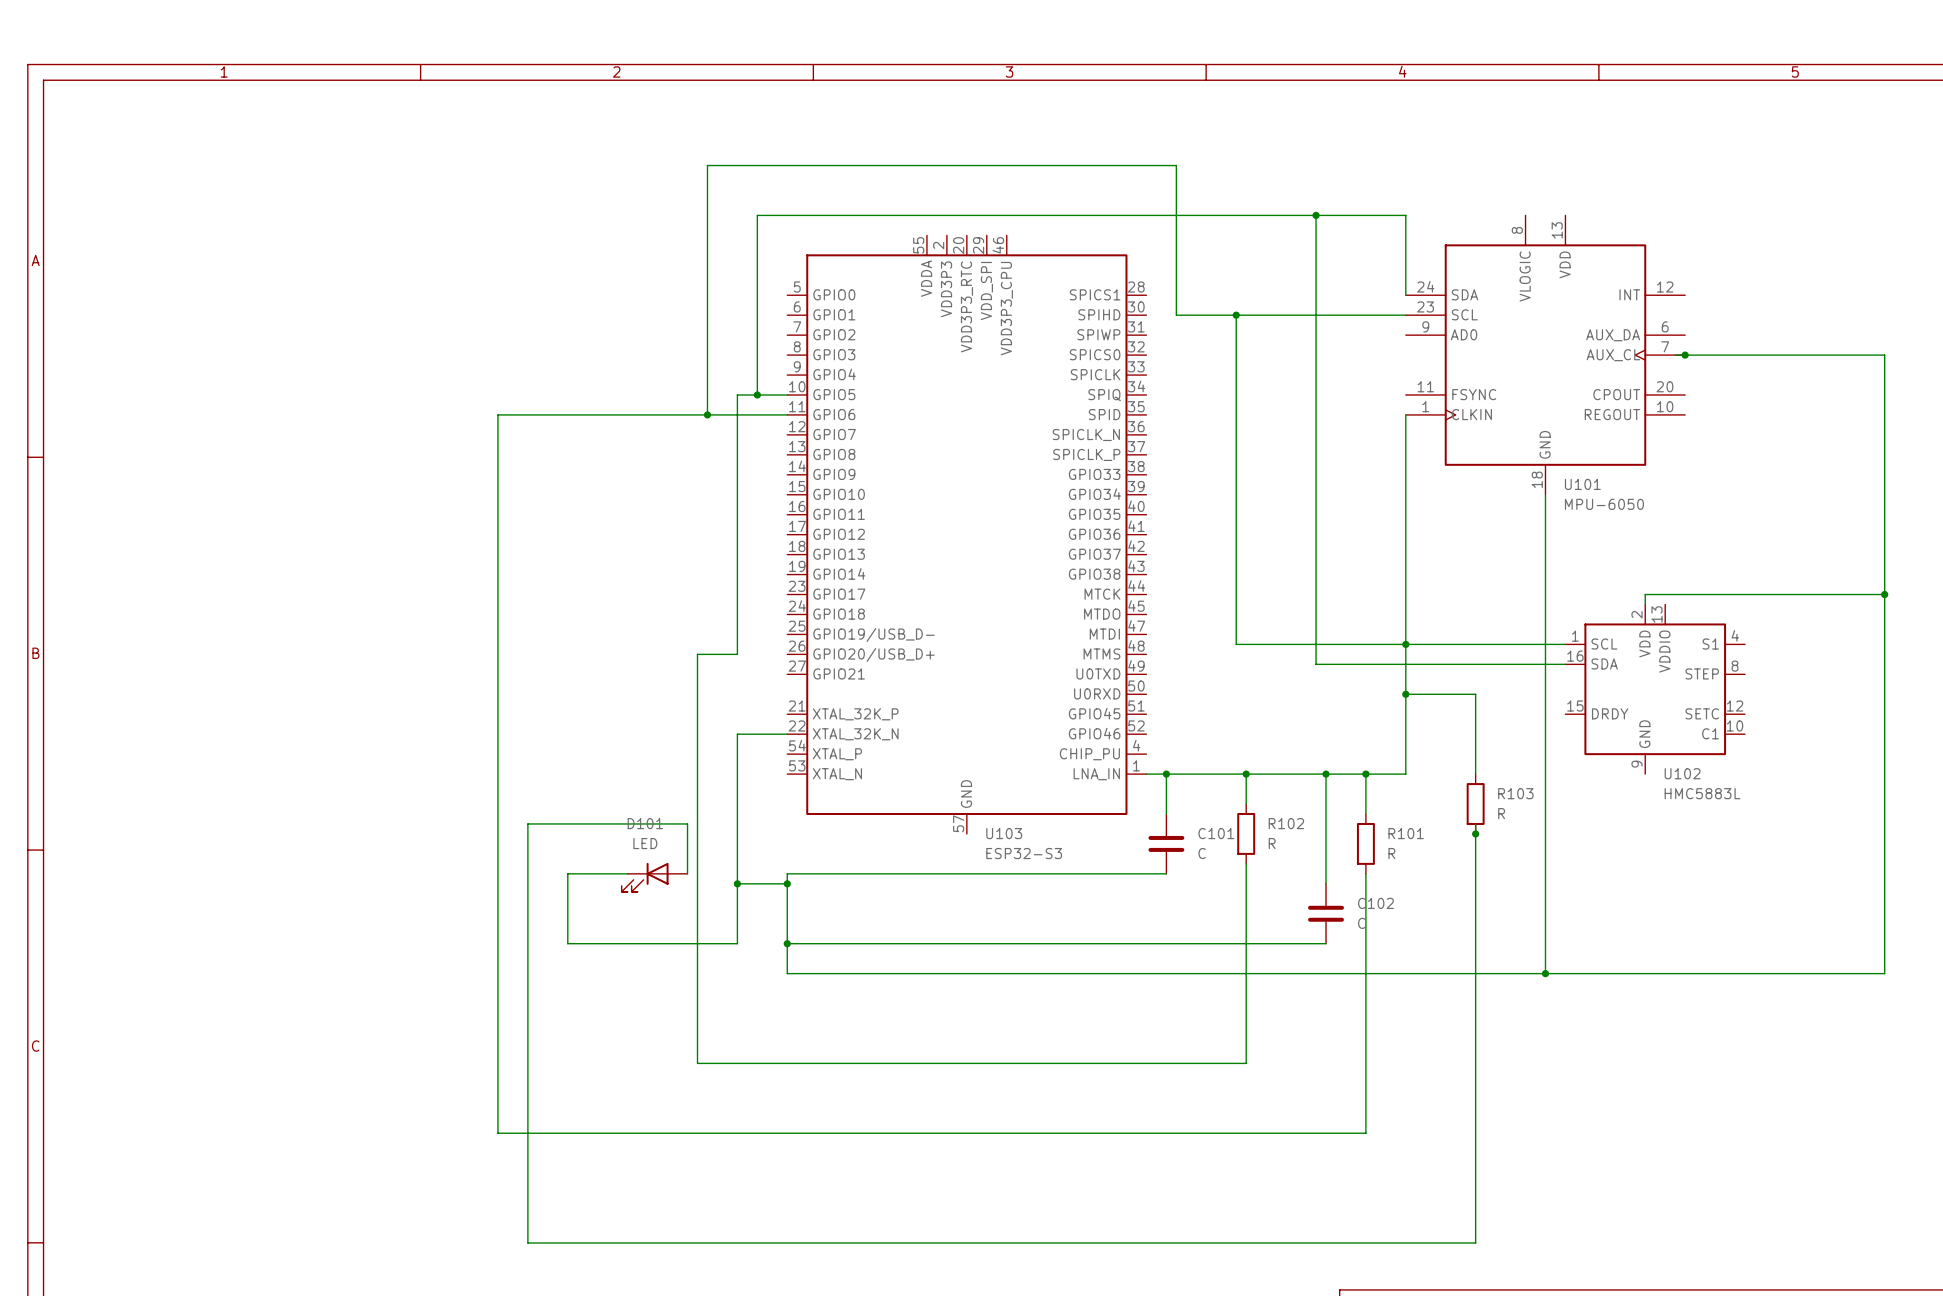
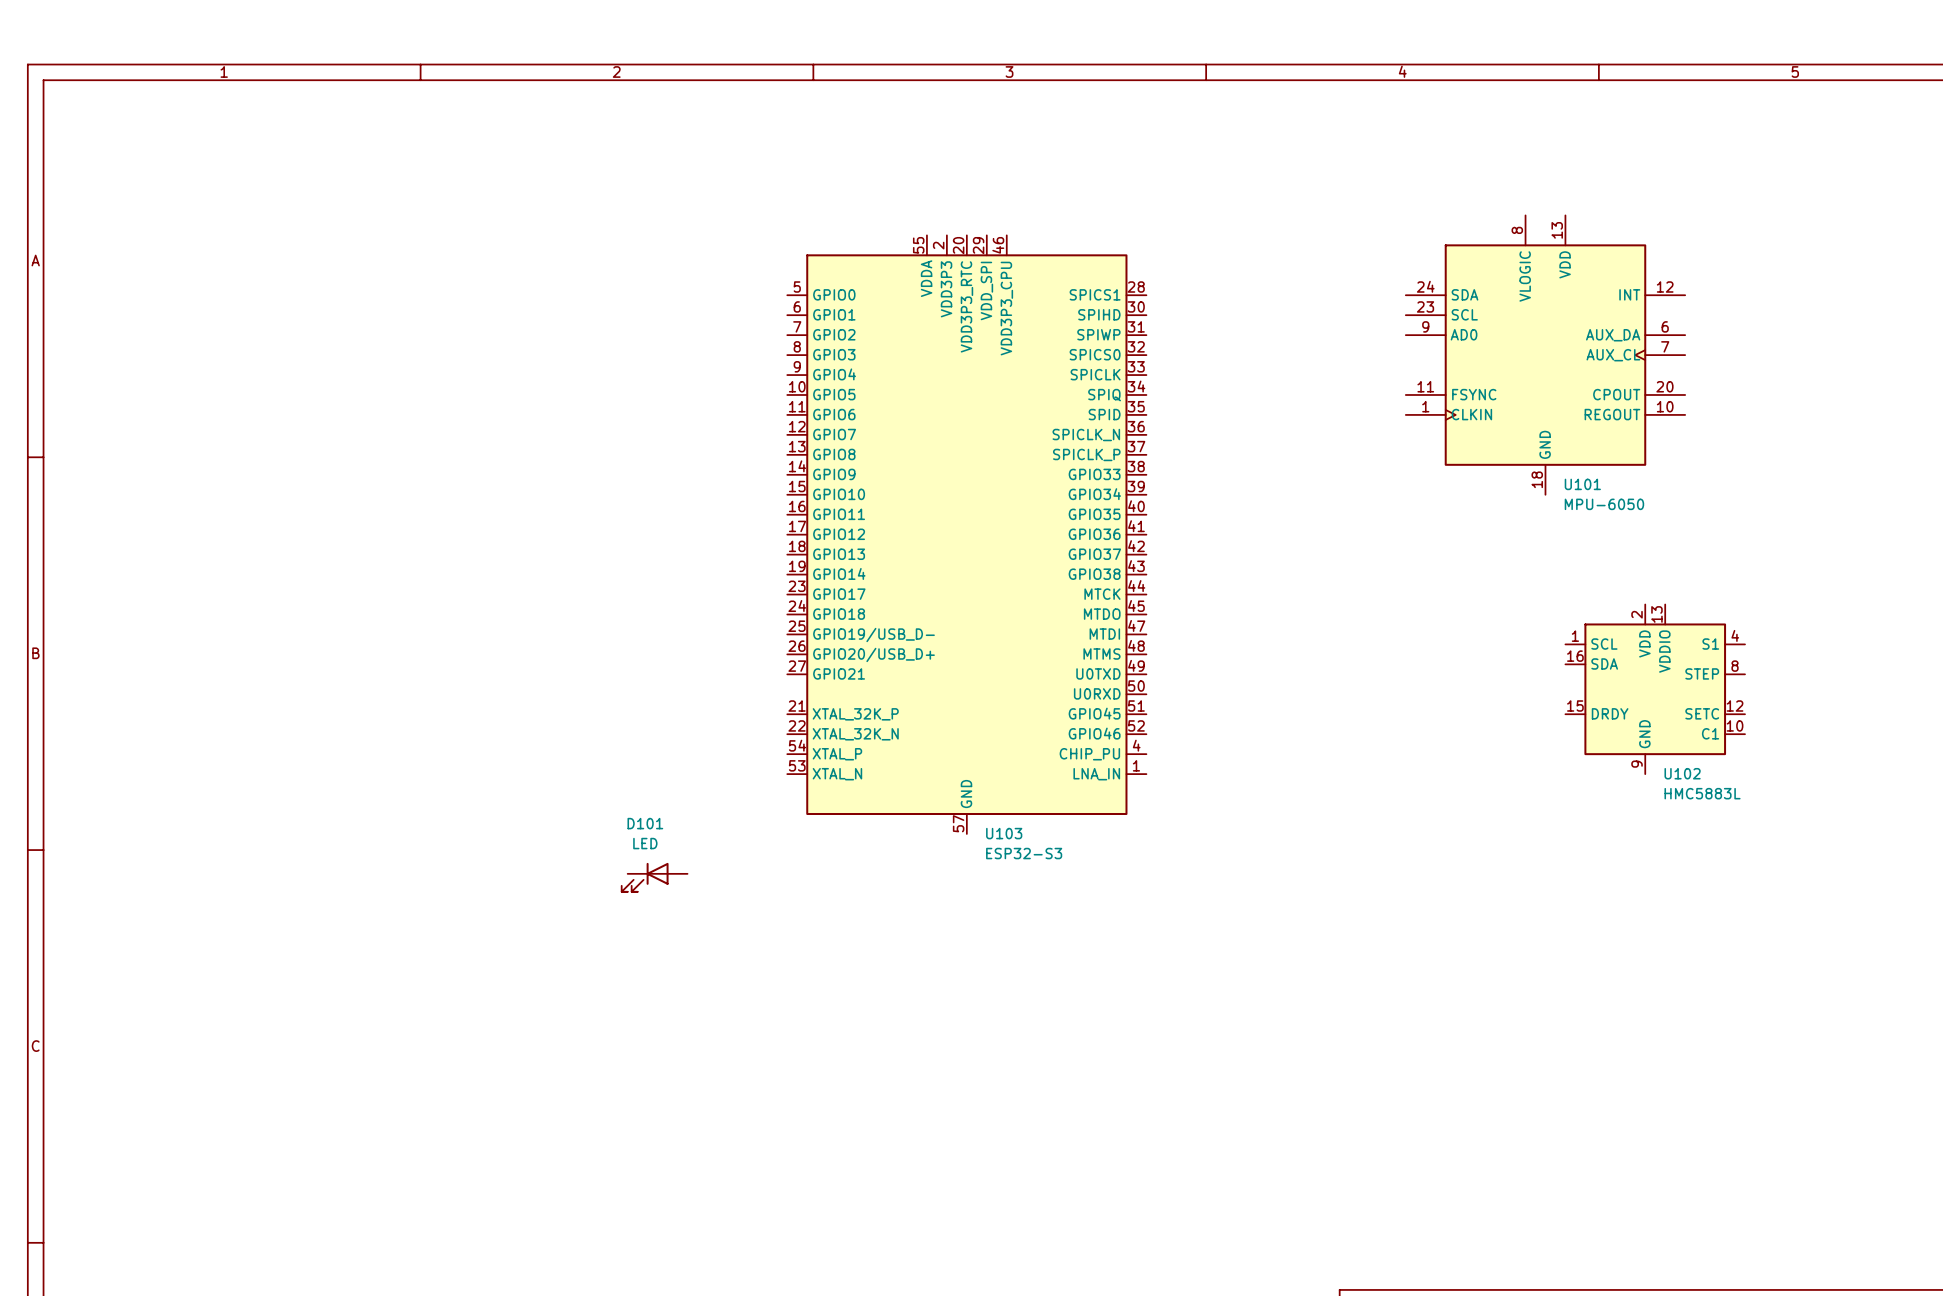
wire: (1316, 215) (1316, 664) (1565, 664) -> none
junction: (1316, 215) -> none
wire: (1405, 295) (1405, 215) (757, 215) (757, 394) -> none
wire: (1236, 315) (1236, 644) (1565, 644) -> none
junction: (1236, 315) -> none
wire: (1405, 315) (1176, 315) (1176, 165) (707, 165) (707, 414) -> none
wire: (1675, 355) (1884, 355) (1884, 973) (787, 973) (787, 873) (1166, 873) -> none
junction: (1685, 355) -> none
junction: (757, 394) -> none
wire: (787, 394) (737, 394) (737, 654) (697, 654) (697, 1063) (1246, 1063) (1246, 863) -> none
junction: (707, 414) -> none
wire: (787, 414) (497, 414) (497, 1133) (1365, 1133) (1365, 873) -> none
wire: (1405, 414) (1405, 774) (1146, 774) -> none
wire: (1545, 494) (1545, 973) -> none
wire: (1884, 594) (1645, 594) (1645, 604) -> none
junction: (1884, 594) -> none
junction: (1405, 644) -> none
wire: (1405, 694) (1475, 694) (1475, 774) -> none
junction: (1405, 694) -> none
wire: (787, 734) (737, 734) (737, 943) (567, 943) (567, 873) (627, 873) -> none
wire: (1166, 774) (1166, 814) -> none
junction: (1166, 774) -> none
wire: (1246, 774) (1246, 804) -> none
junction: (1246, 774) -> none
wire: (1326, 774) (1326, 883) -> none
junction: (1326, 774) -> none
wire: (1365, 774) (1365, 814) -> none
junction: (1365, 774) -> none
R103: R (1475, 804) -> none
wire: (1475, 823) (1475, 1242) (527, 1242) (527, 823) (687, 823) (687, 873) -> none
R102: R (1246, 833) -> none
junction: (1475, 833) -> none
C101: C (1166, 843) -> none
R101: R (1365, 843) -> none
wire: (737, 883) (787, 883) -> none
junction: (737, 883) -> none
junction: (787, 883) -> none
C102: C (1326, 913) -> none
wire: (787, 943) (1326, 943) -> none
junction: (787, 943) -> none
junction: (1545, 973) -> none

